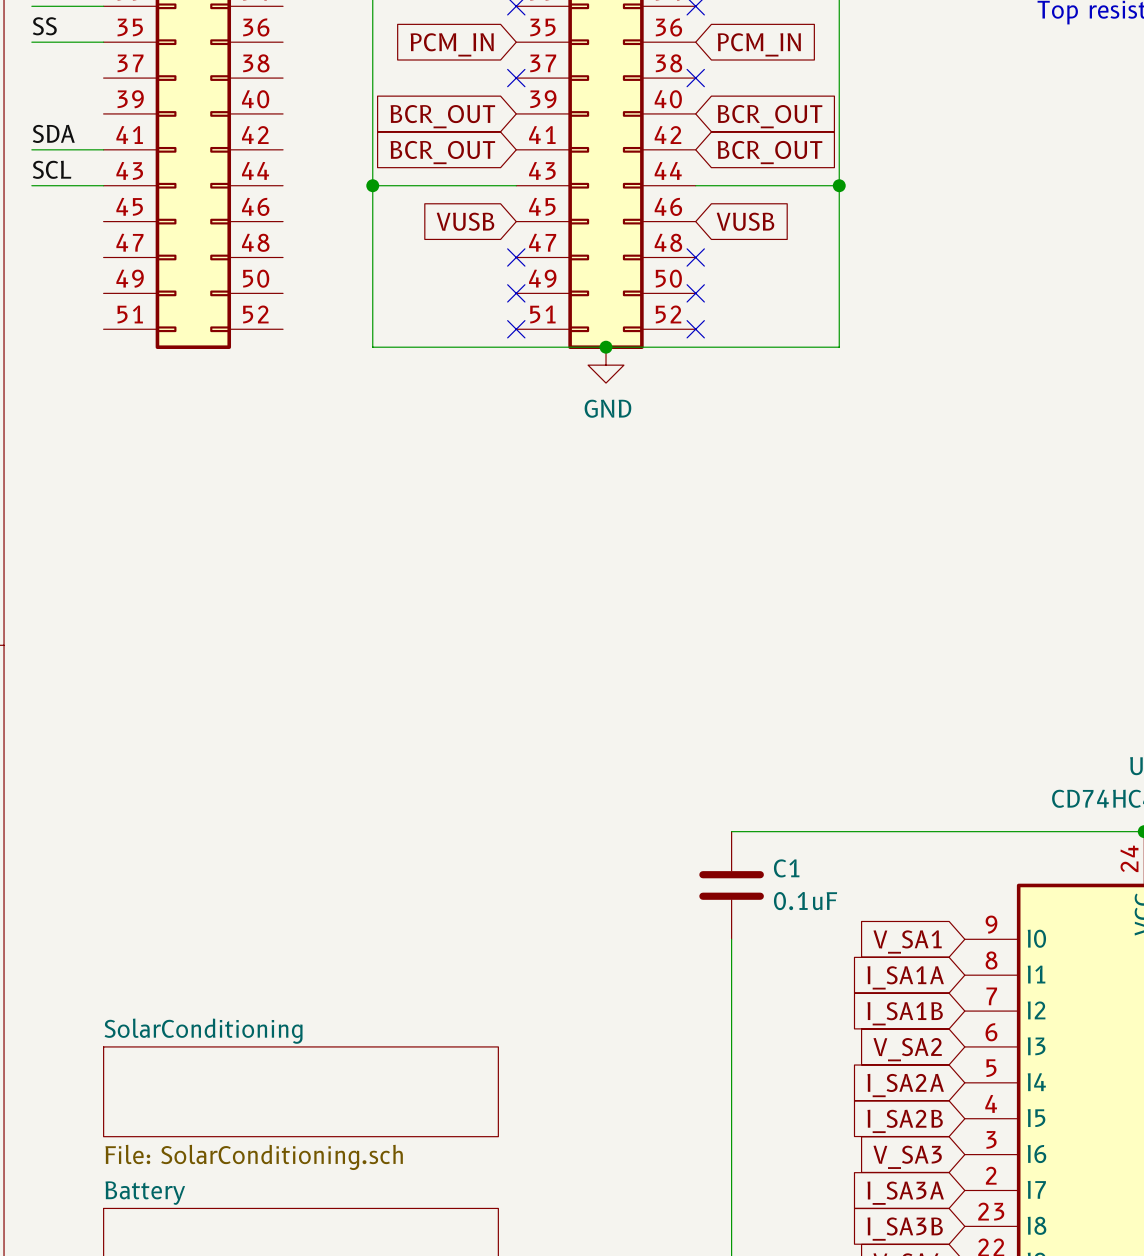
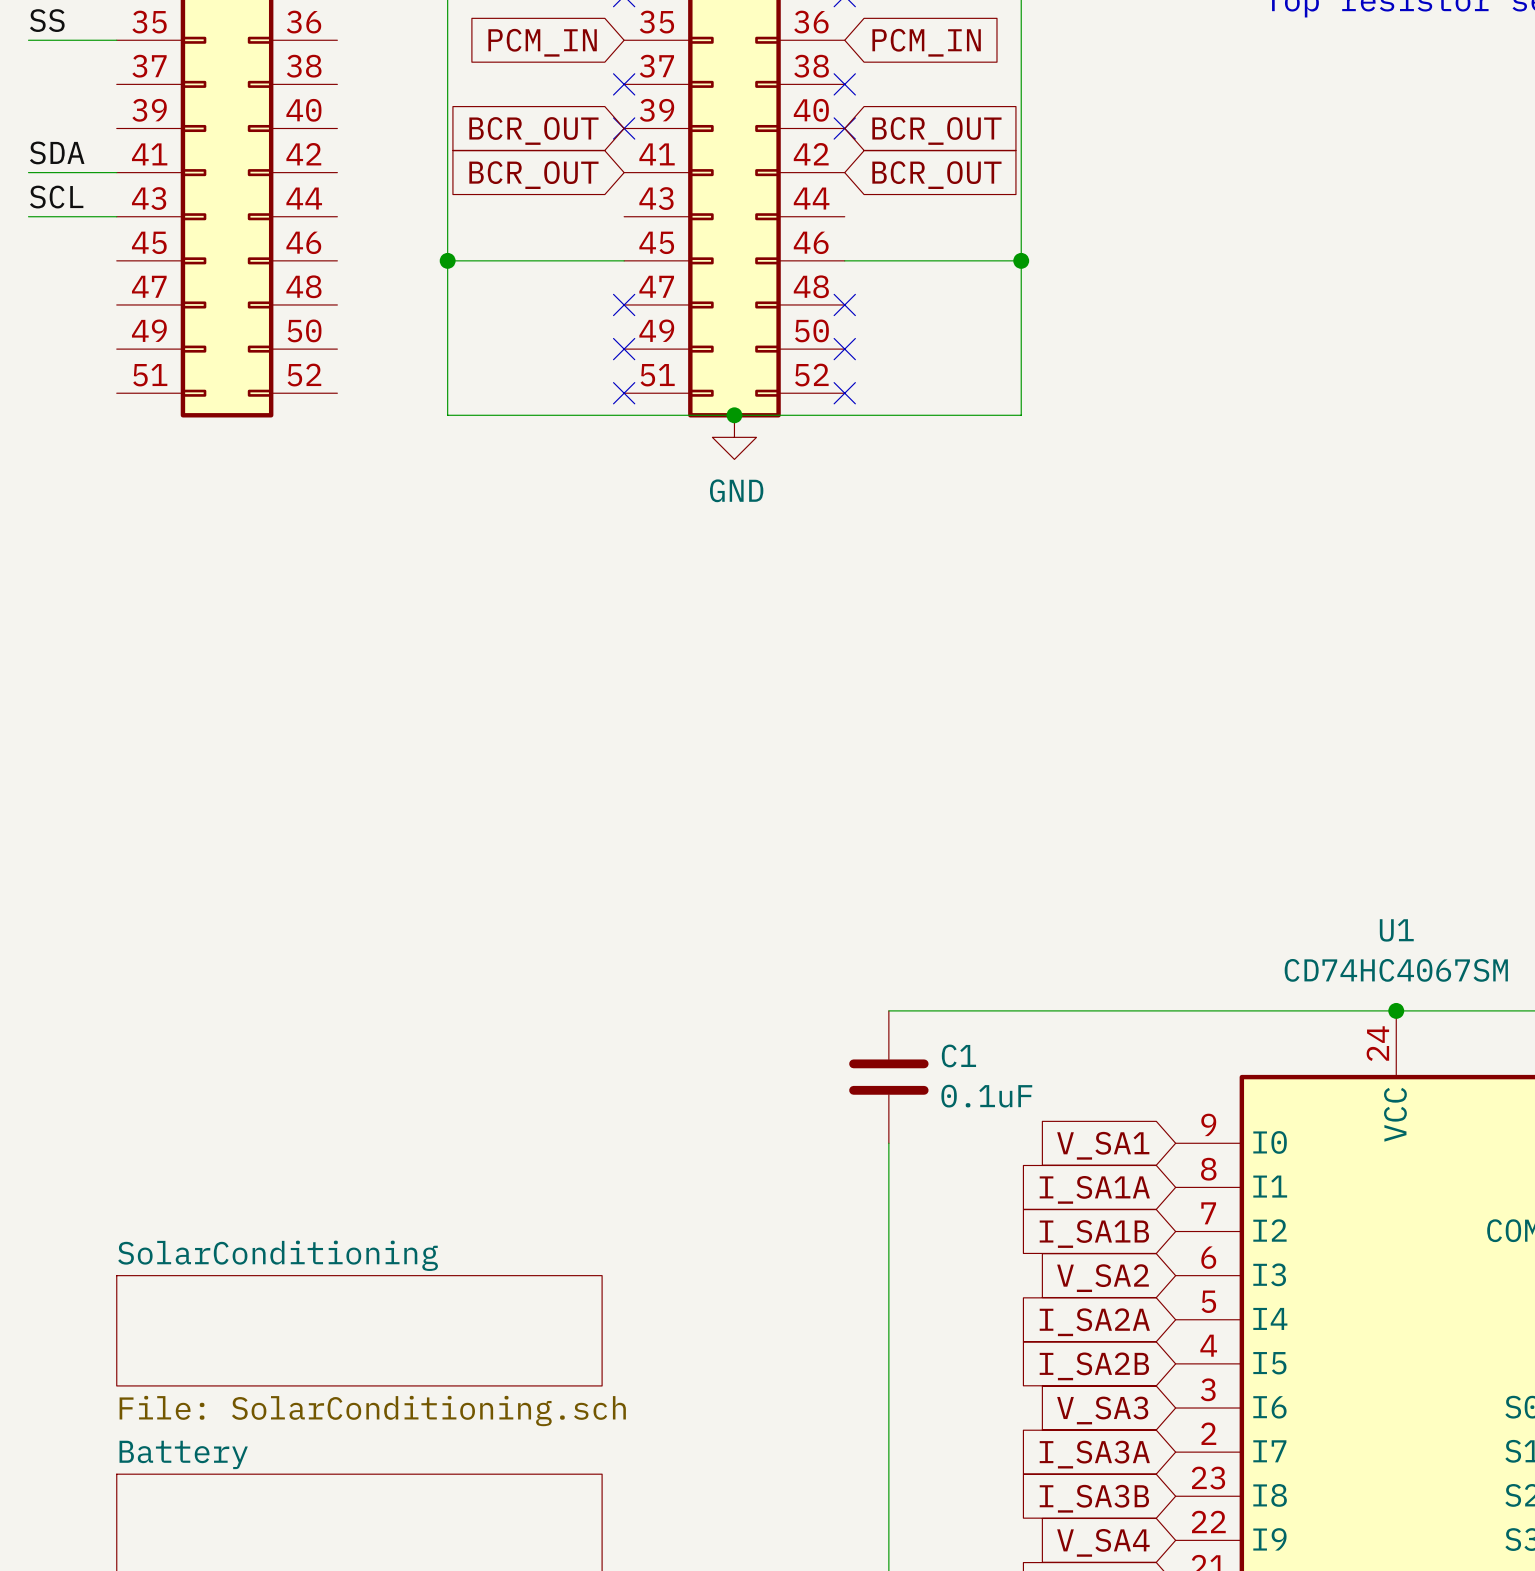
no-connect mark: none -> (624, 128)
no-connect mark: none -> (844, 128)
wire: (372, 185) (516, 185) -> (447, 260) (624, 260)
junction position: (372, 185) -> (447, 260)
wire: (695, 185) (839, 185) -> (844, 260) (1021, 260)
junction position: (839, 185) -> (1021, 260)
global label: VUSB (465, 221) -> none
global label: VUSB (745, 221) -> none

